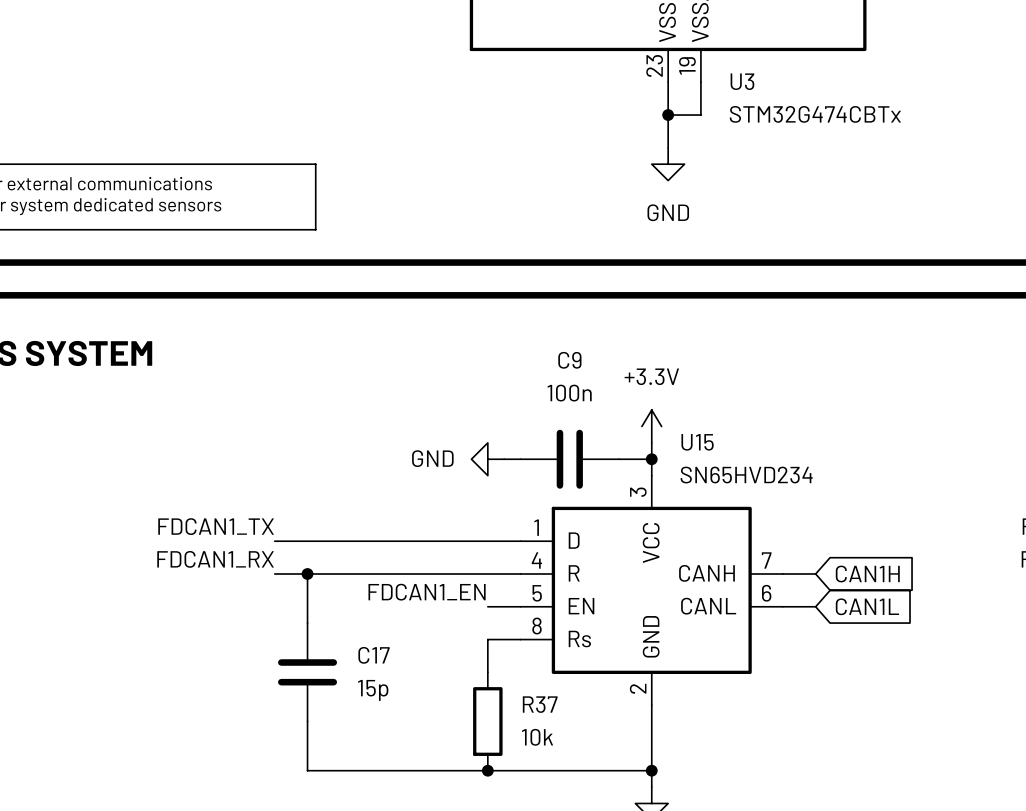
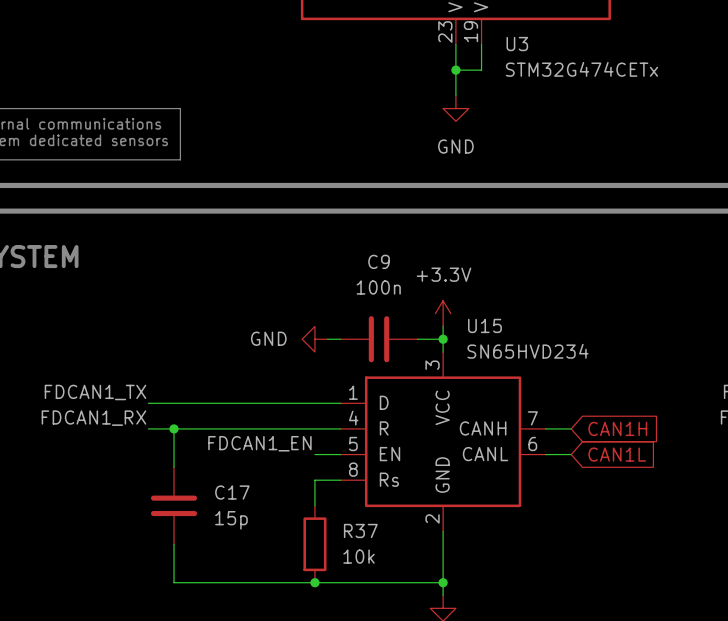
U3 value: STM32G474CBTx (815, 114) -> STM32G474CETx (581, 69)

